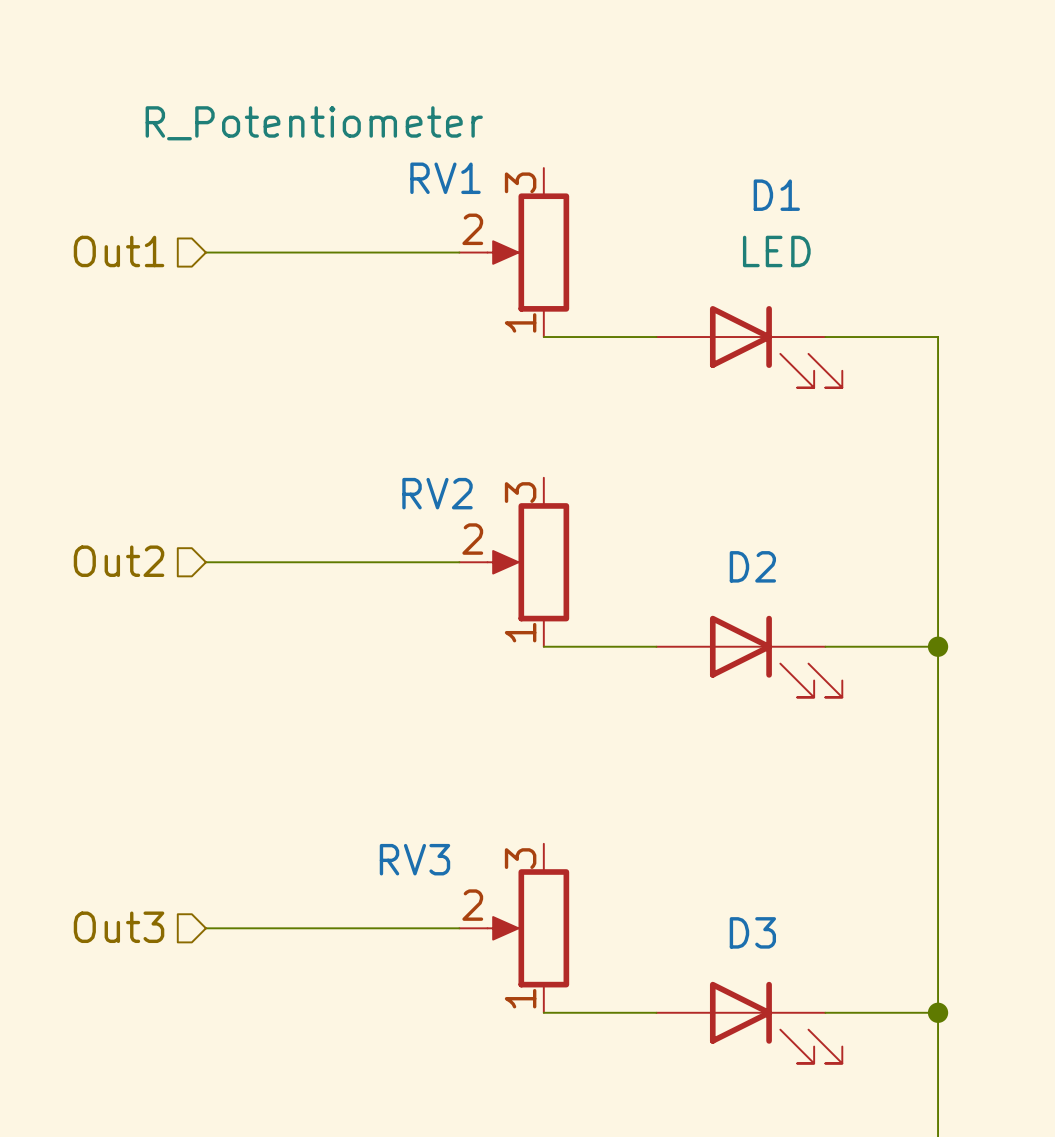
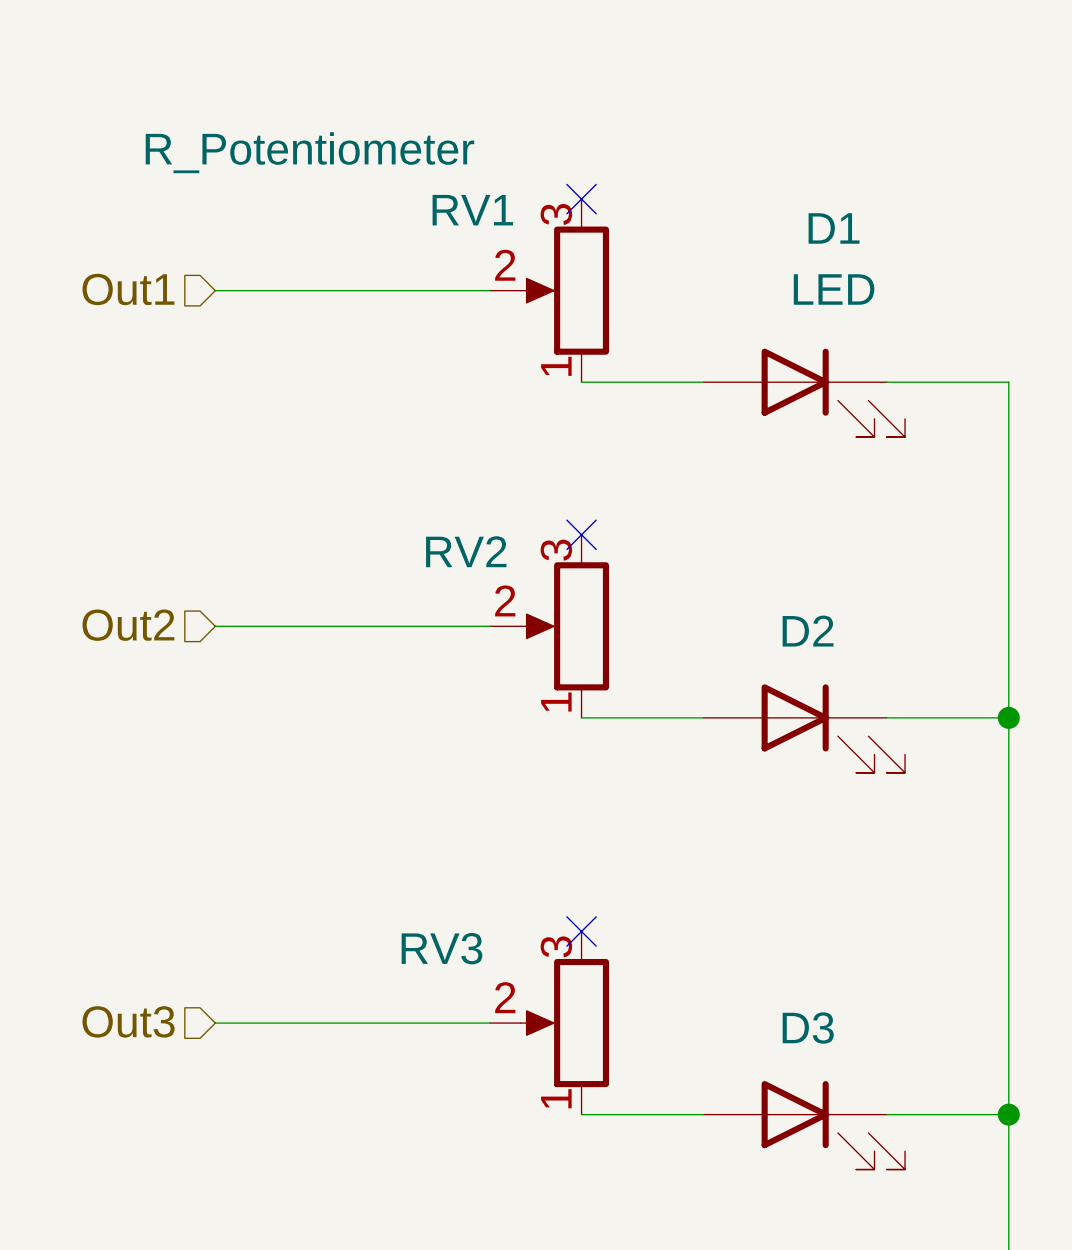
no-connect mark: none -> (581, 199)
no-connect mark: none -> (581, 534)
no-connect mark: none -> (581, 931)

